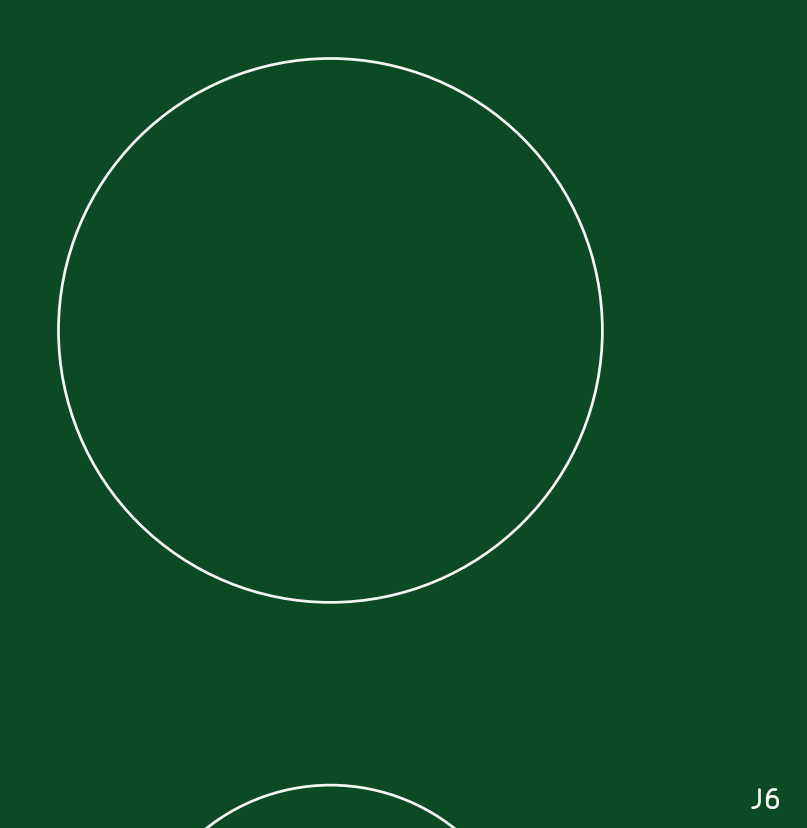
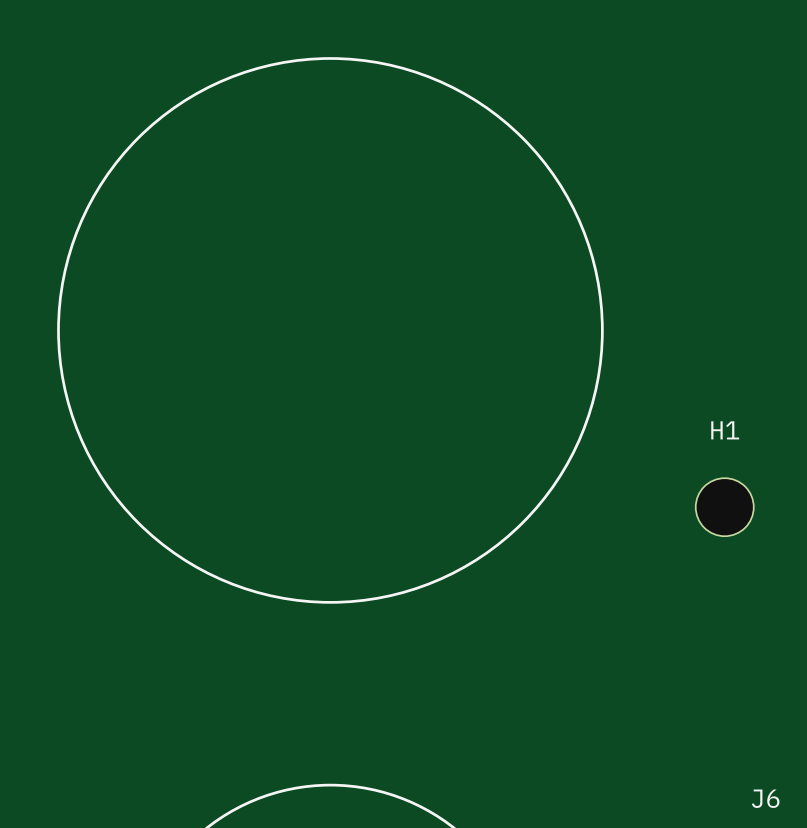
H1: none -> (724, 507)

